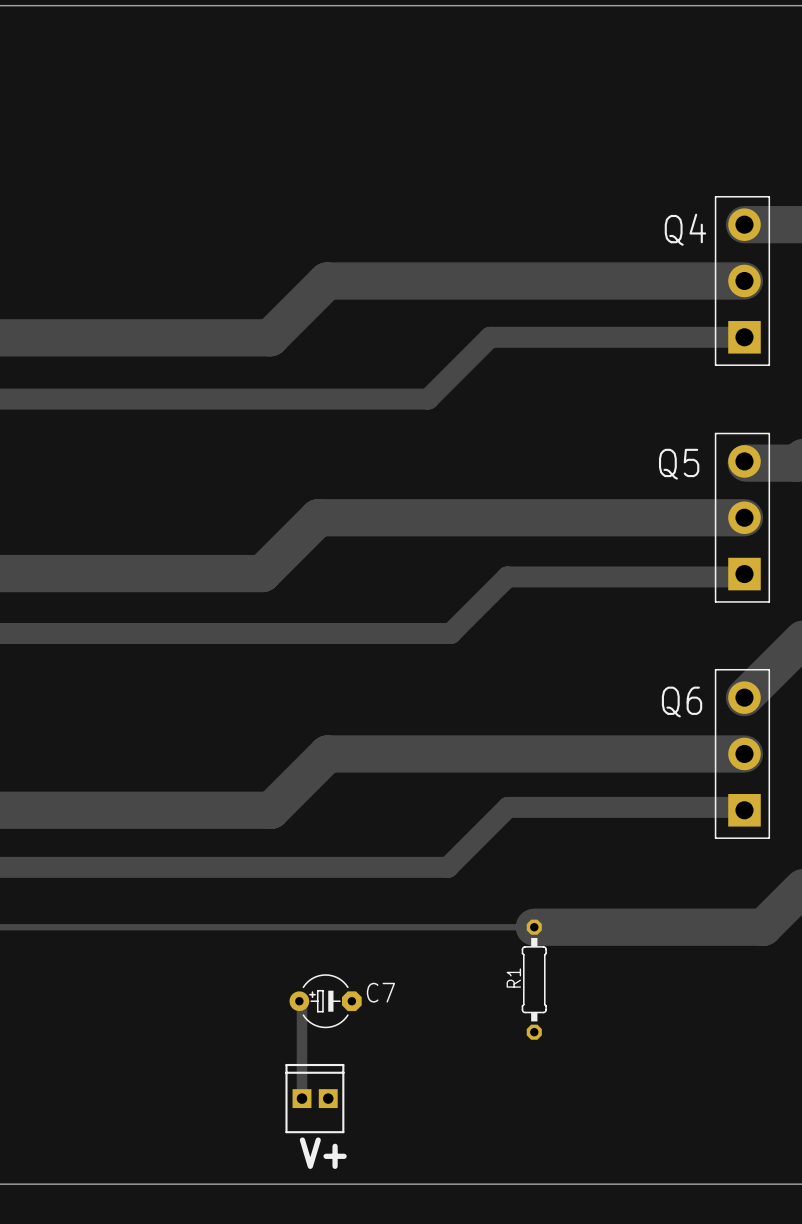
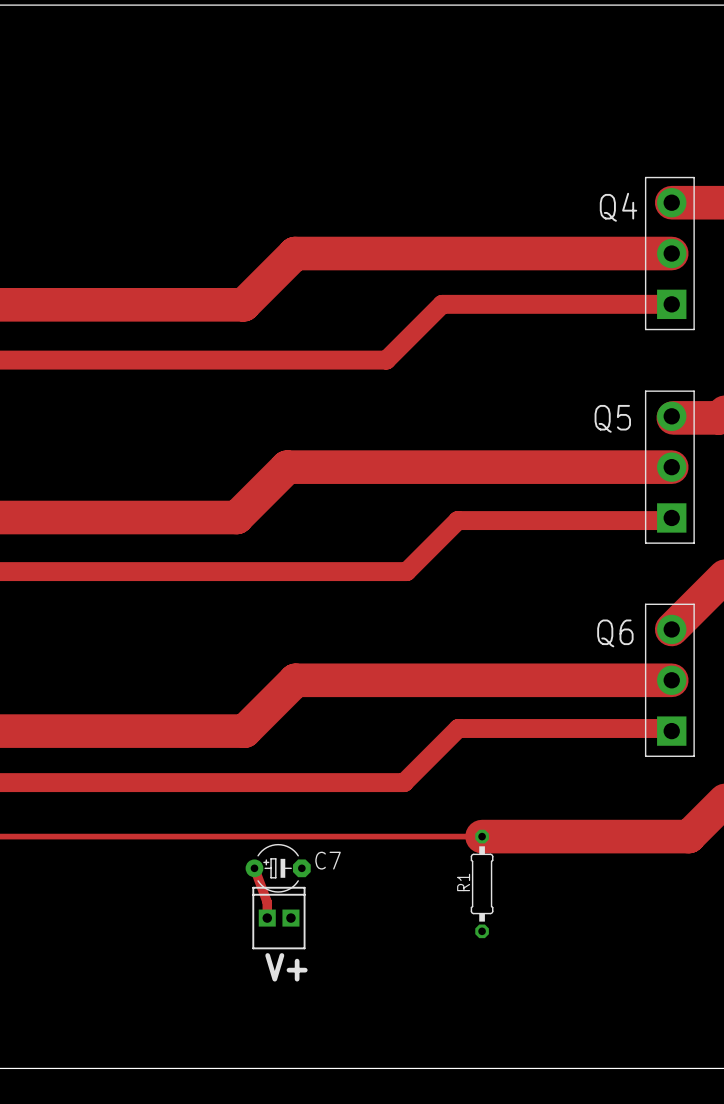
track: none -> (254, 868) (267, 902) (267, 918)
track: (299, 1001) (301, 1003) (301, 1098) -> none
C7 position: (325, 1001) -> (278, 868)
V+ position: (314, 1098) -> (278, 918)

